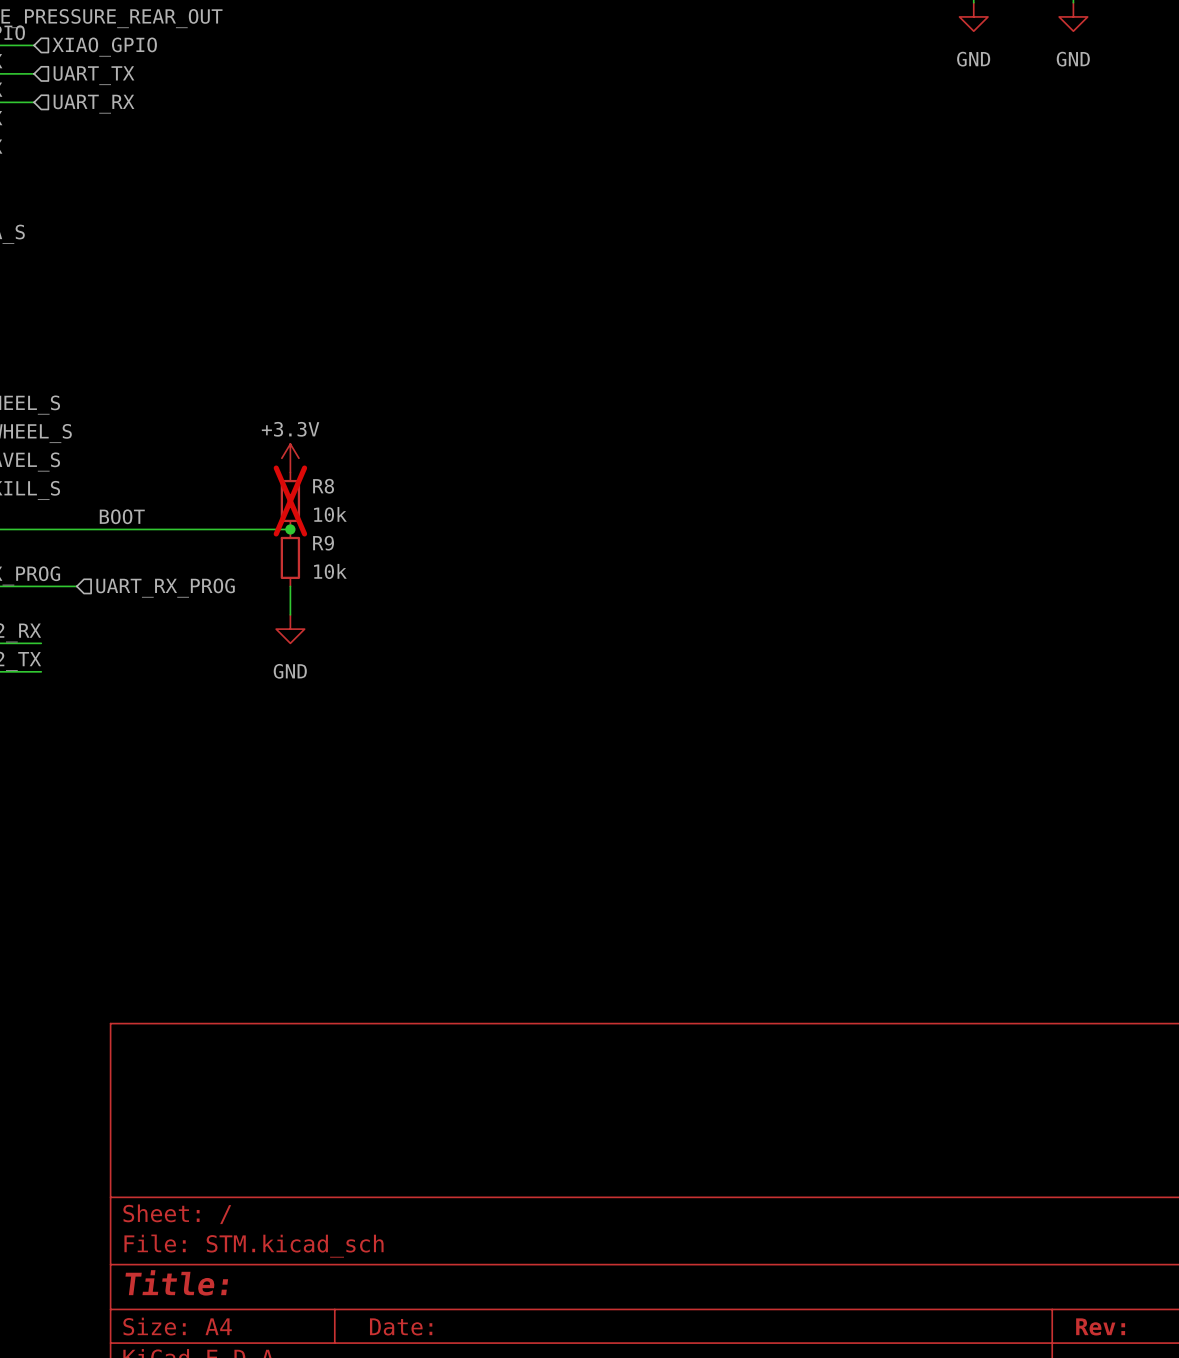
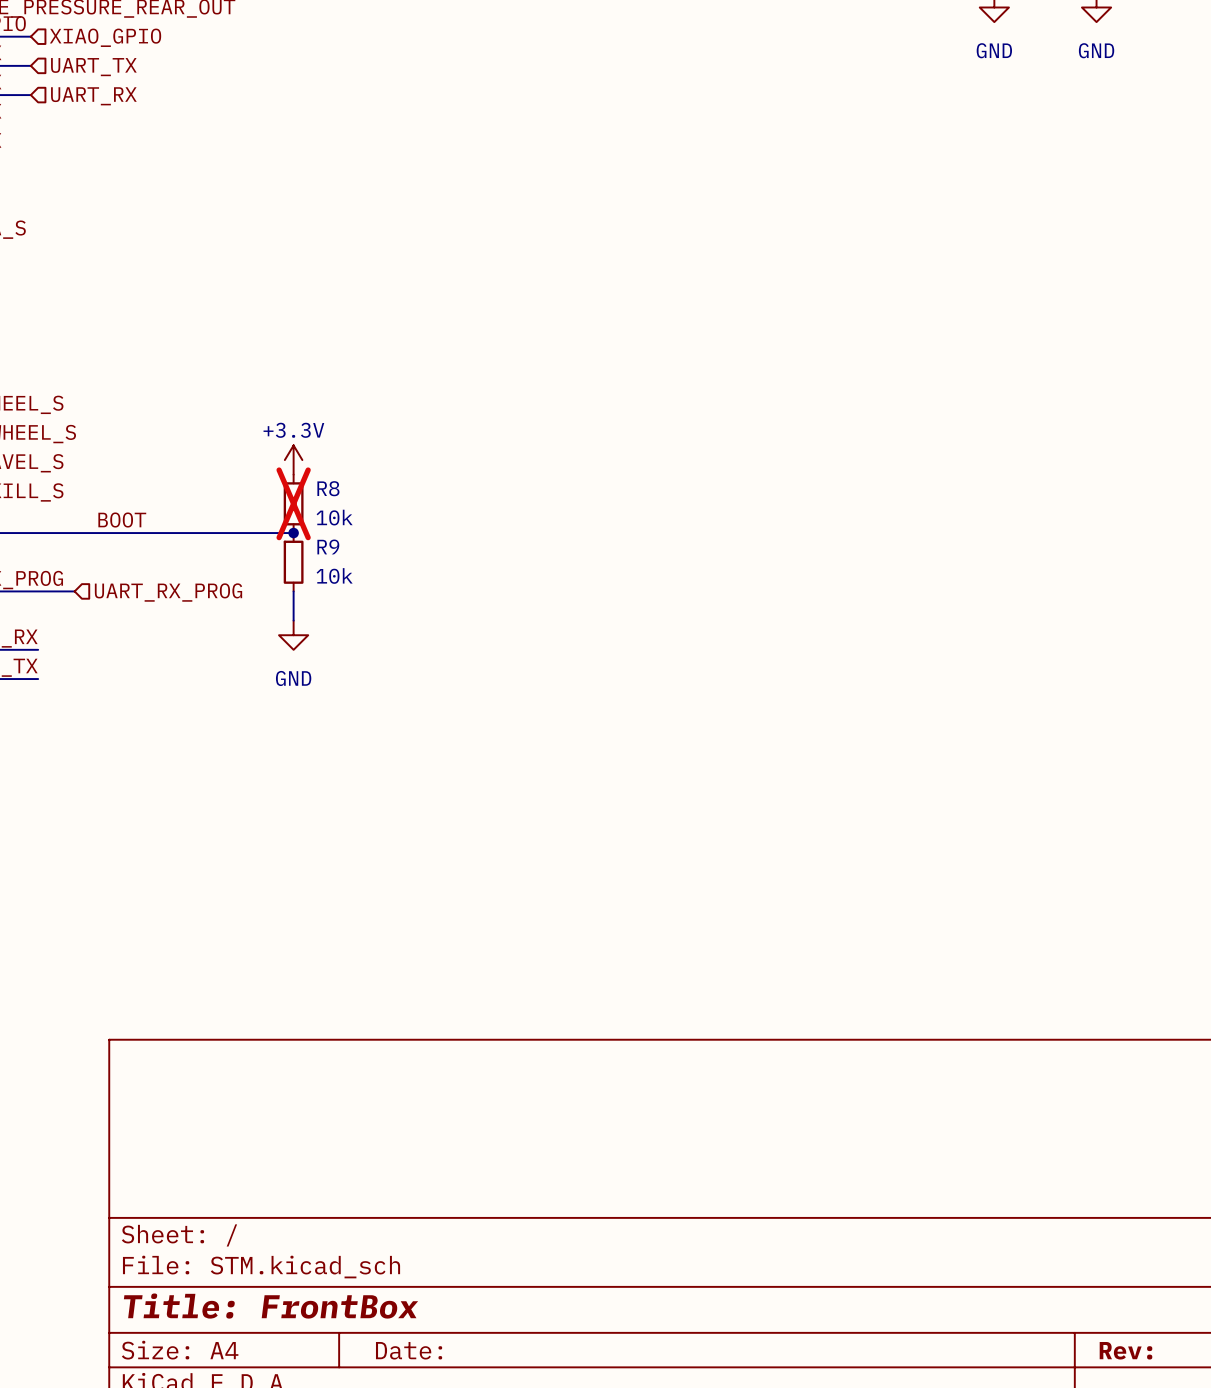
title block: Title: (176, 1282) -> Title: FrontBox (271, 1306)

